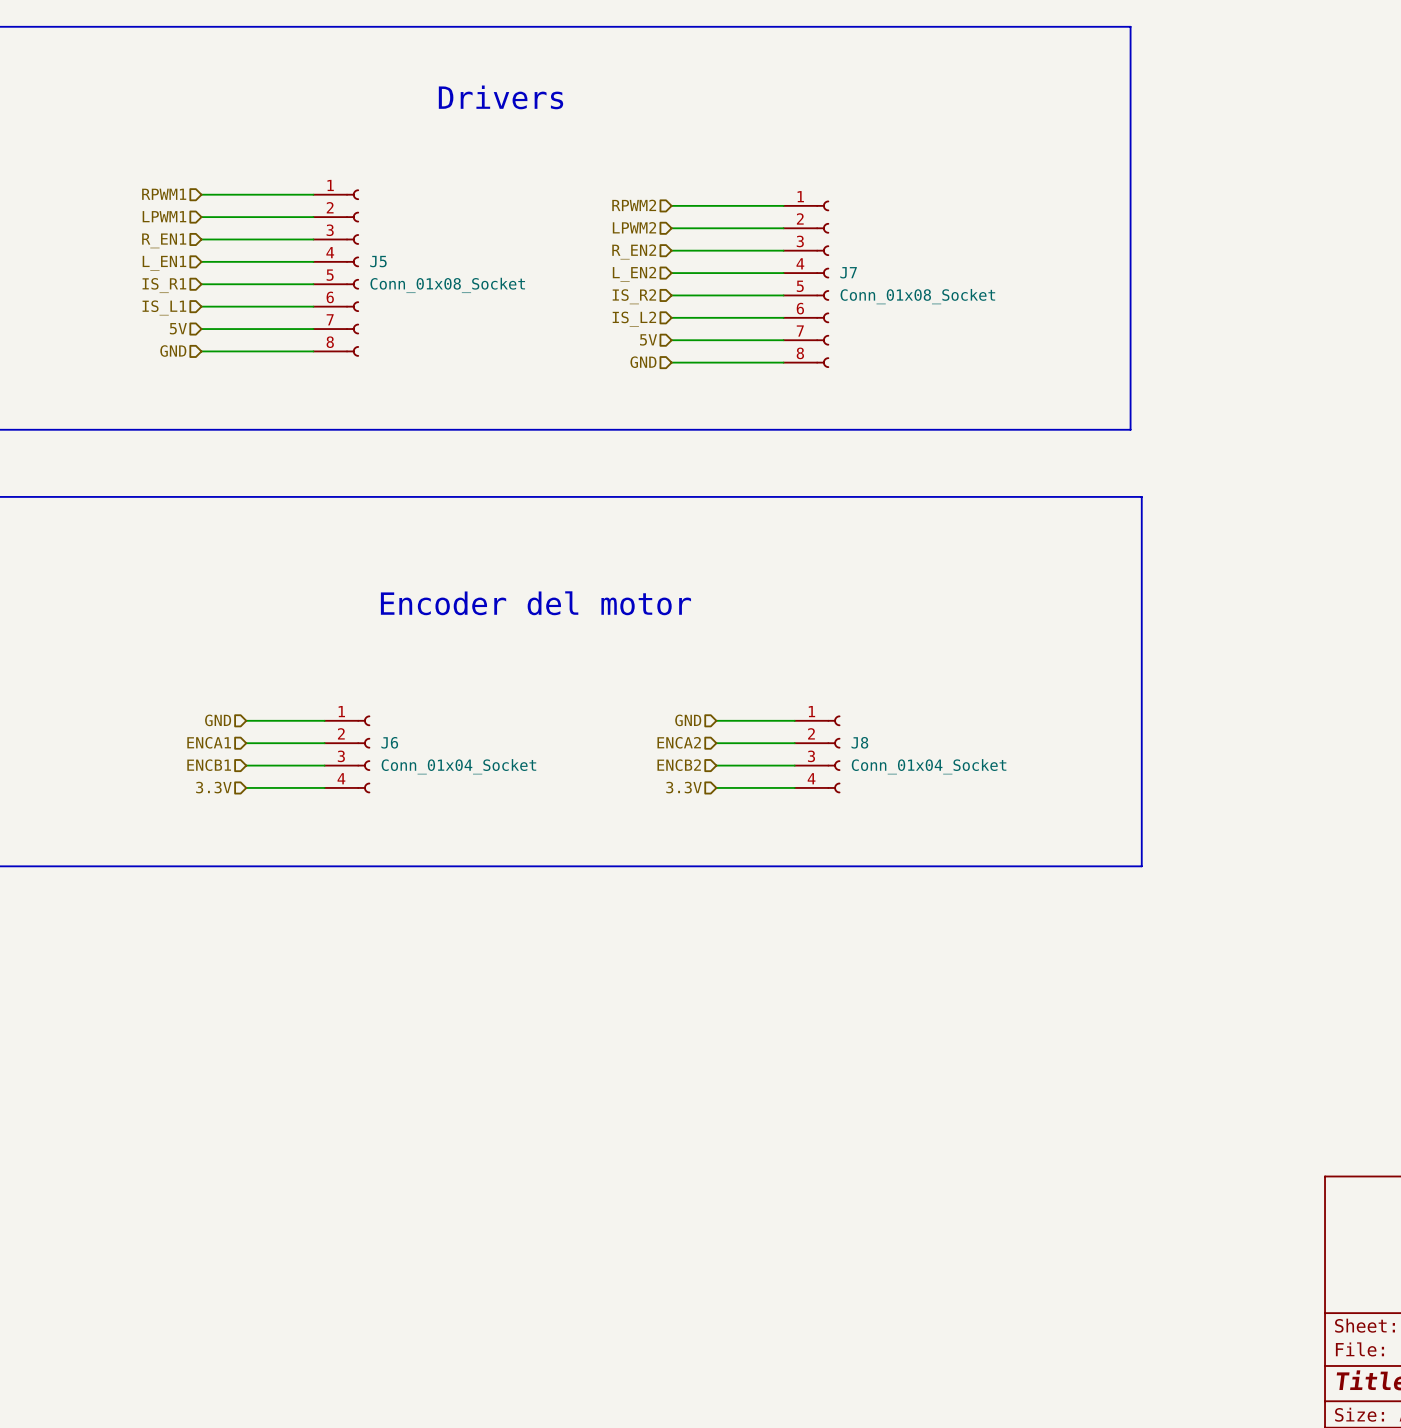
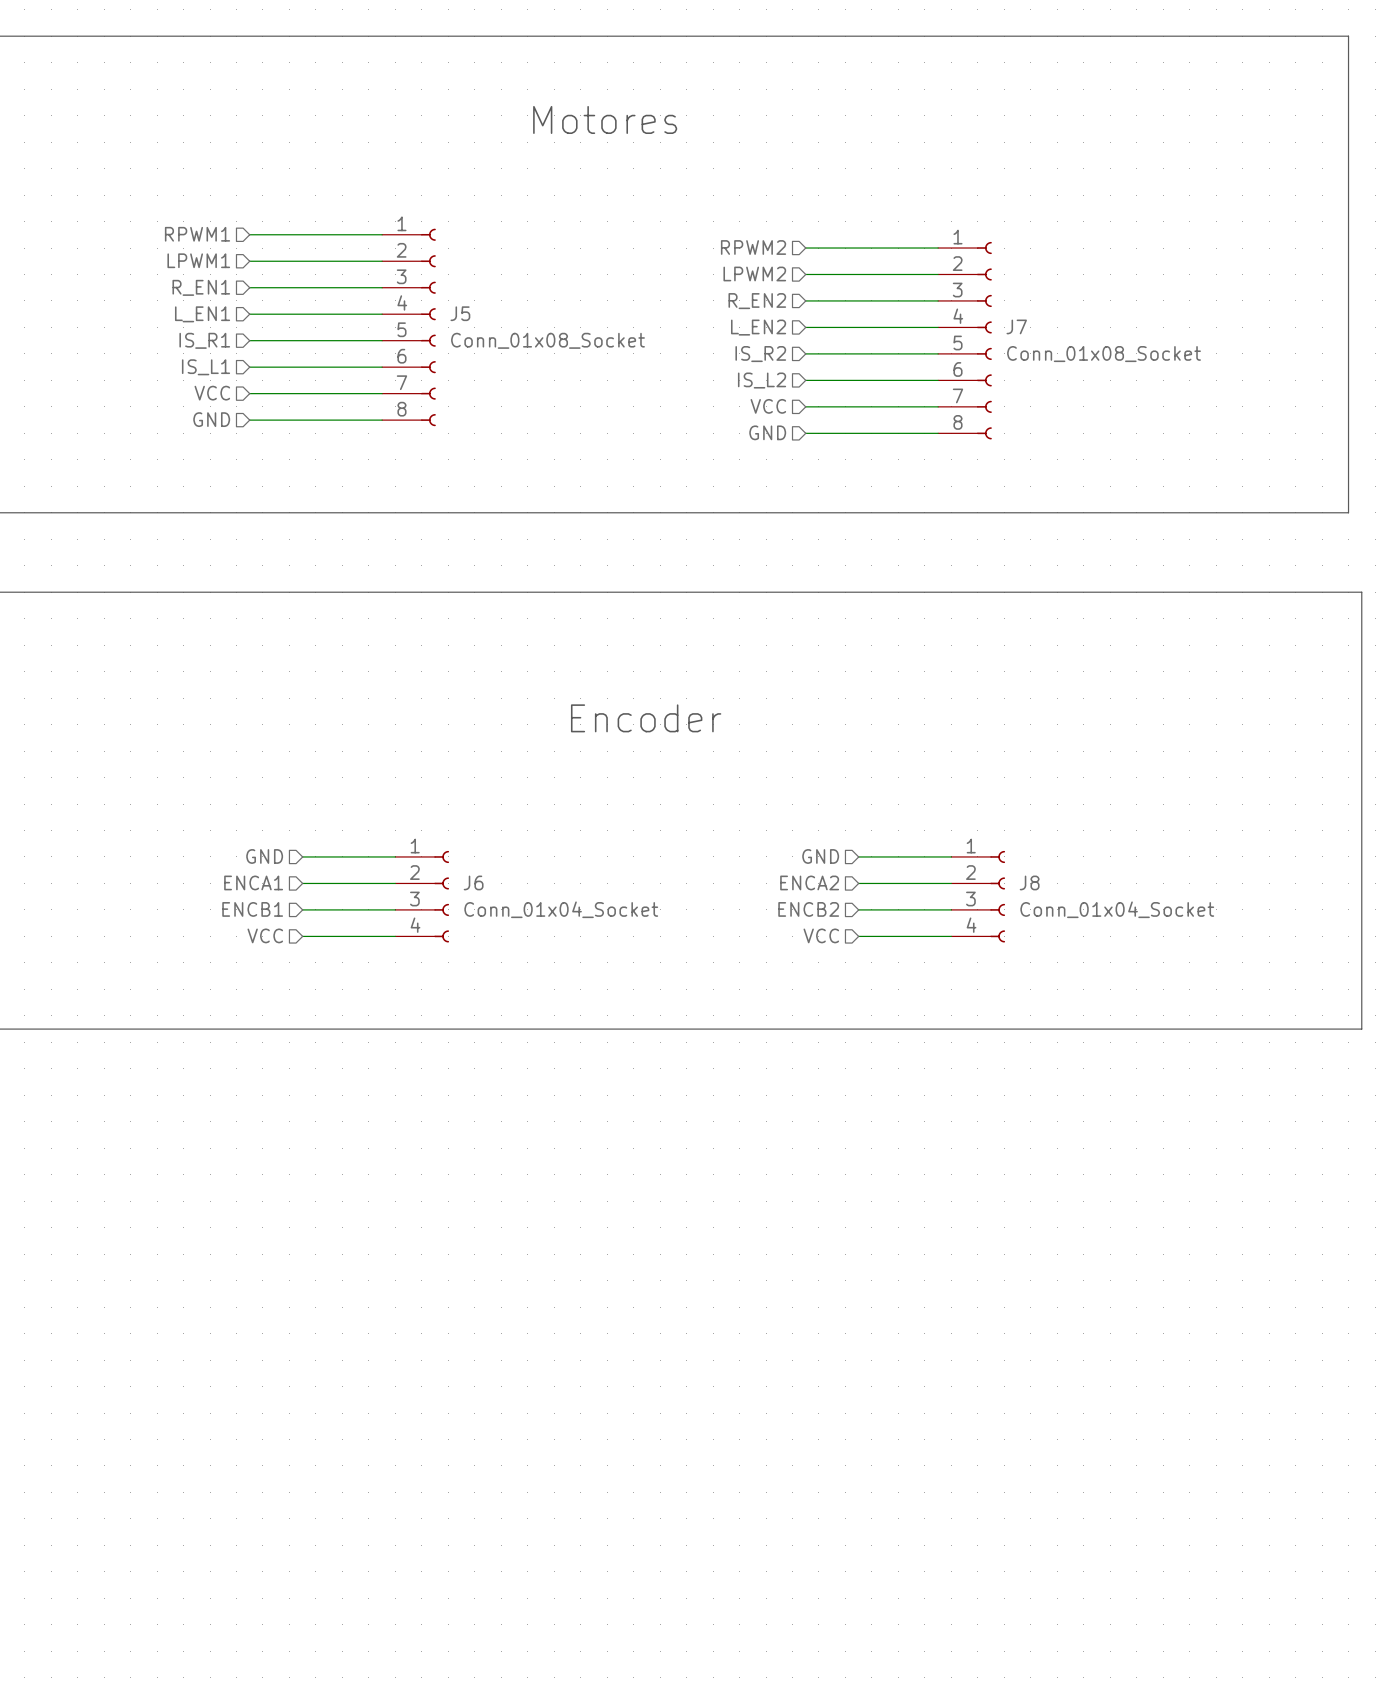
text: Drivers (500, 97) -> Motores (605, 119)
hierarchical label: 5V (178, 328) -> VCC (212, 393)
hierarchical label: 5V (648, 339) -> VCC (768, 406)
text: Encoder del motor (535, 603) -> Encoder (646, 718)
hierarchical label: 3.3V (213, 787) -> VCC (265, 935)
hierarchical label: 3.3V (684, 787) -> VCC (821, 935)

